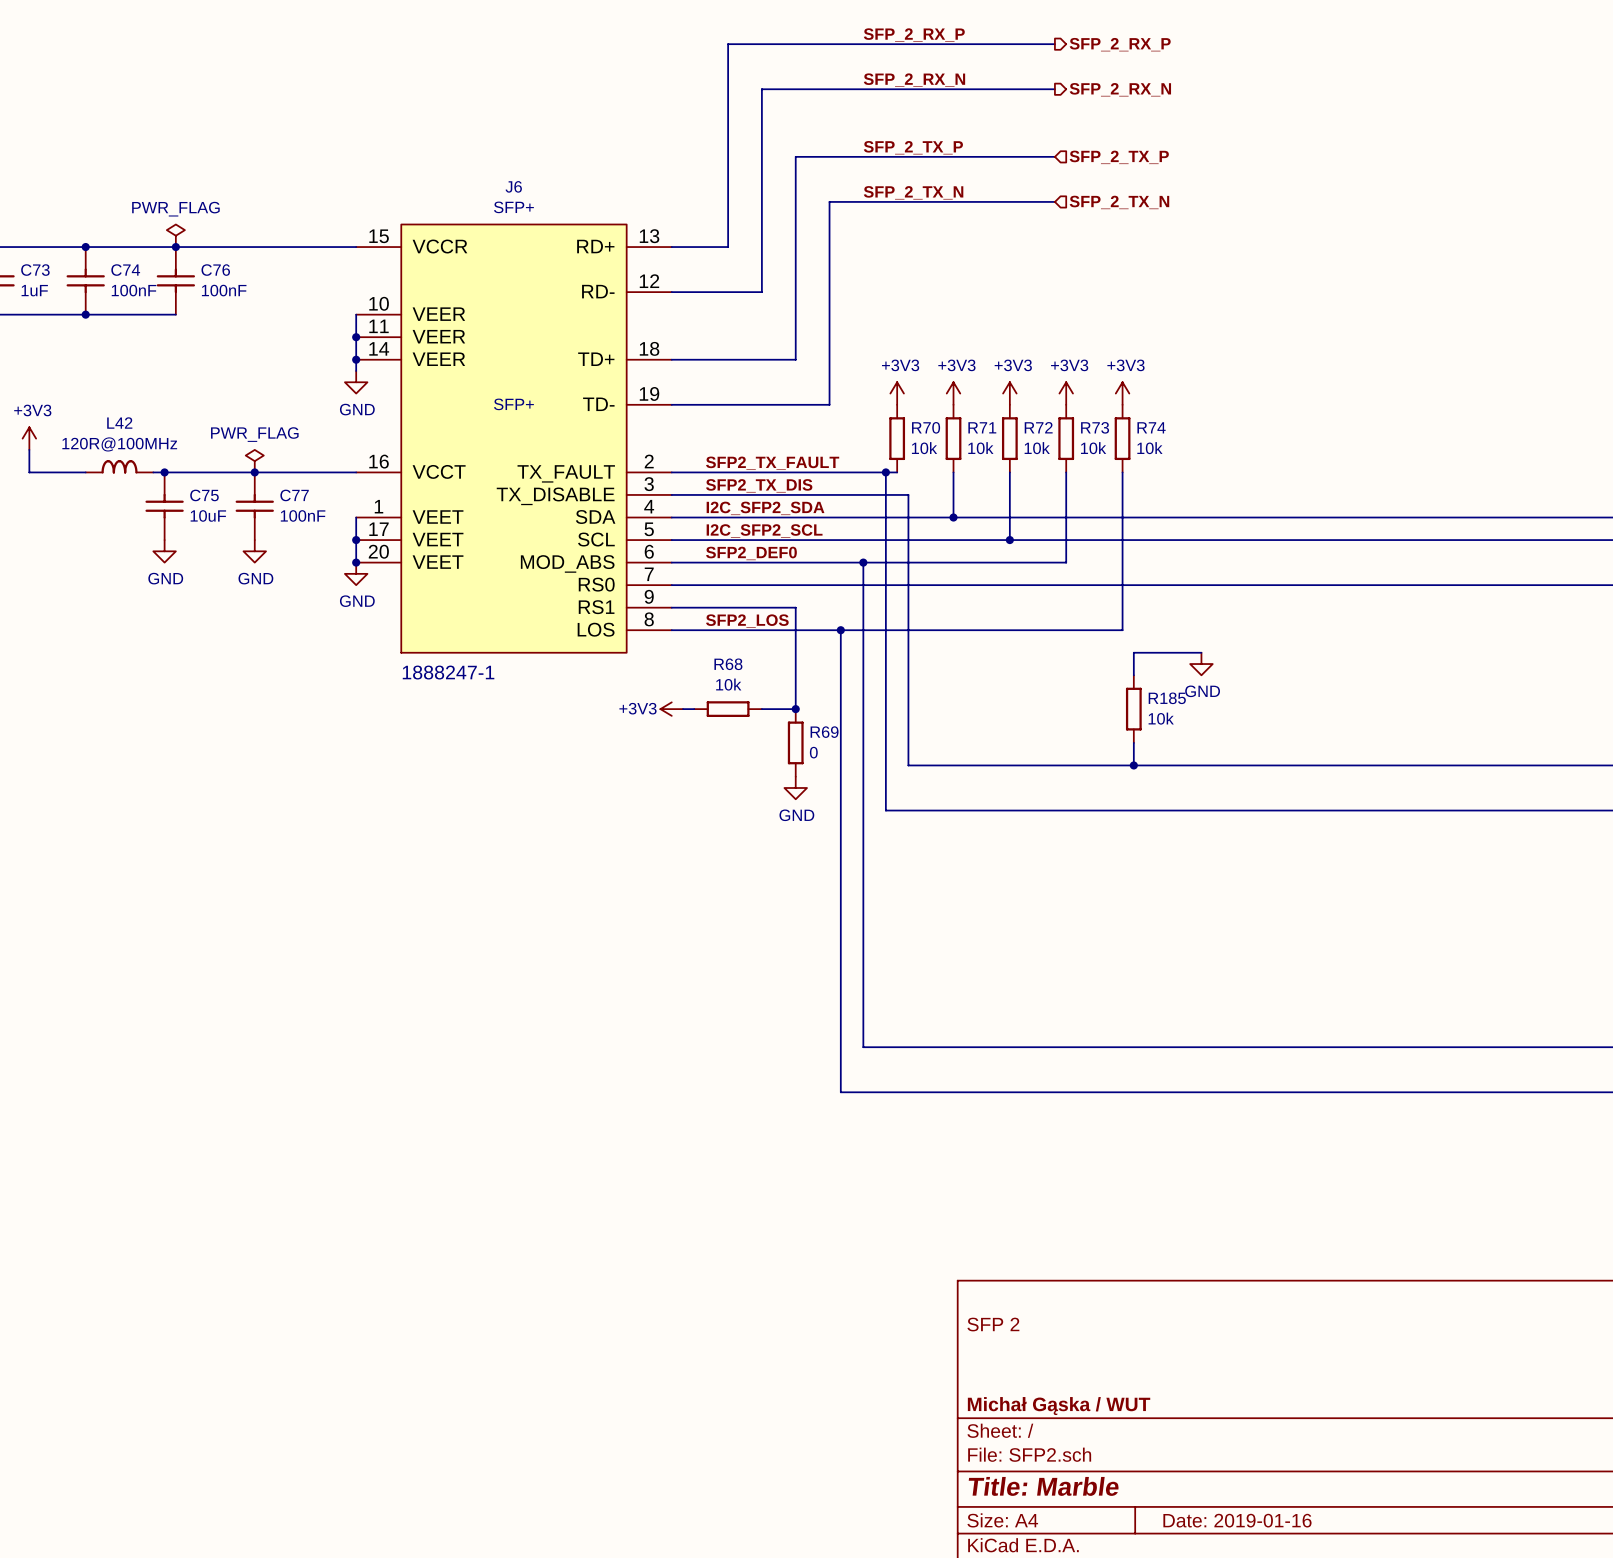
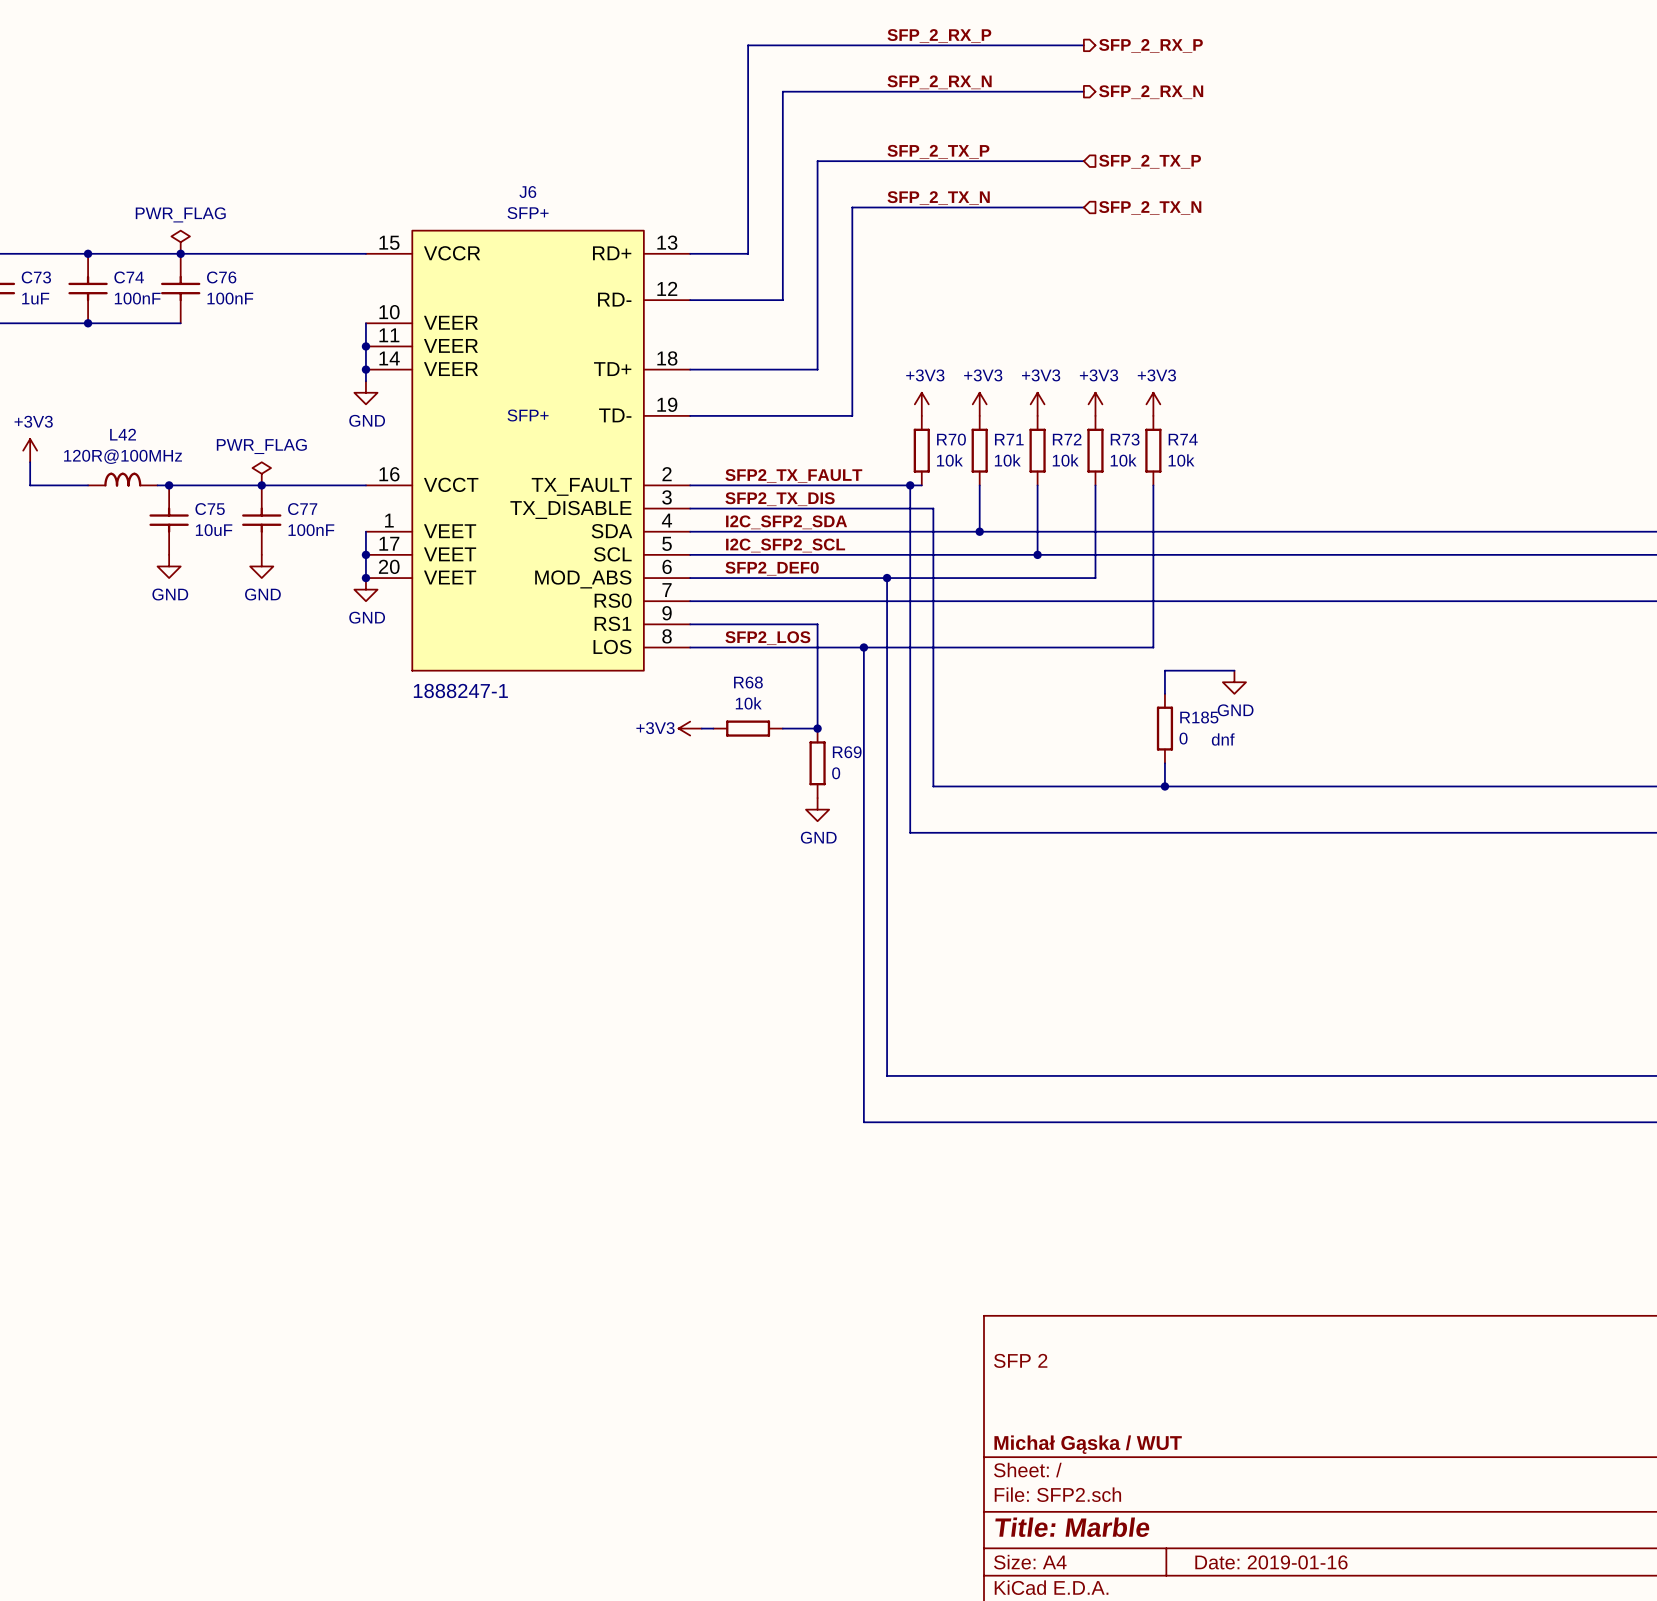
R185 text: 10k (1161, 718) -> 0 (1183, 738)
R185 text: none -> dnf (1223, 739)

